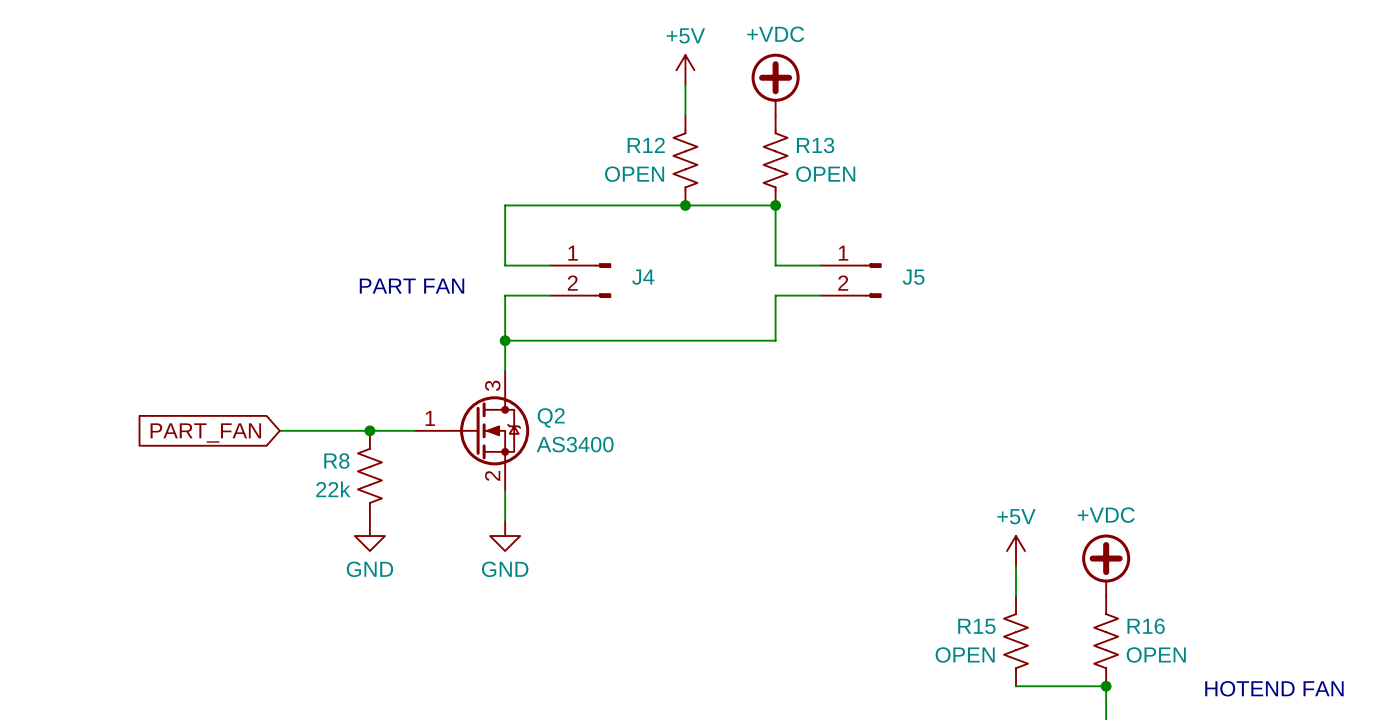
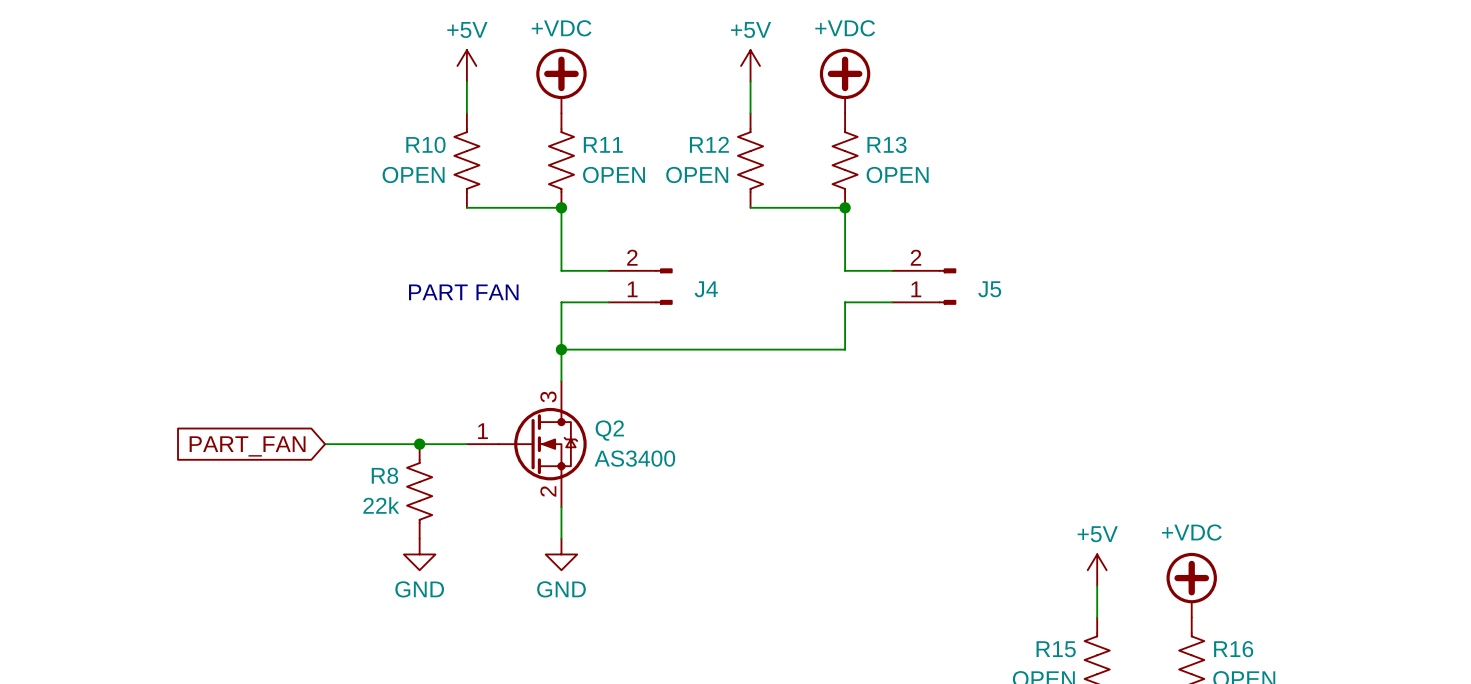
power symbol: none -> +5V (466, 66)
power symbol: none -> +VDC (561, 80)
wire: none -> (466, 81) (466, 113)
R10: none -> OPEN (466, 160)
R11: none -> OPEN (561, 160)
wire: (505, 205) (685, 205) -> (561, 207) (466, 207)
junction: none -> (561, 207)
junction: (685, 205) -> none
J4 flip: as is (602, 280) -> up-down (663, 286)
J5 flip: as is (873, 280) -> up-down (947, 286)

